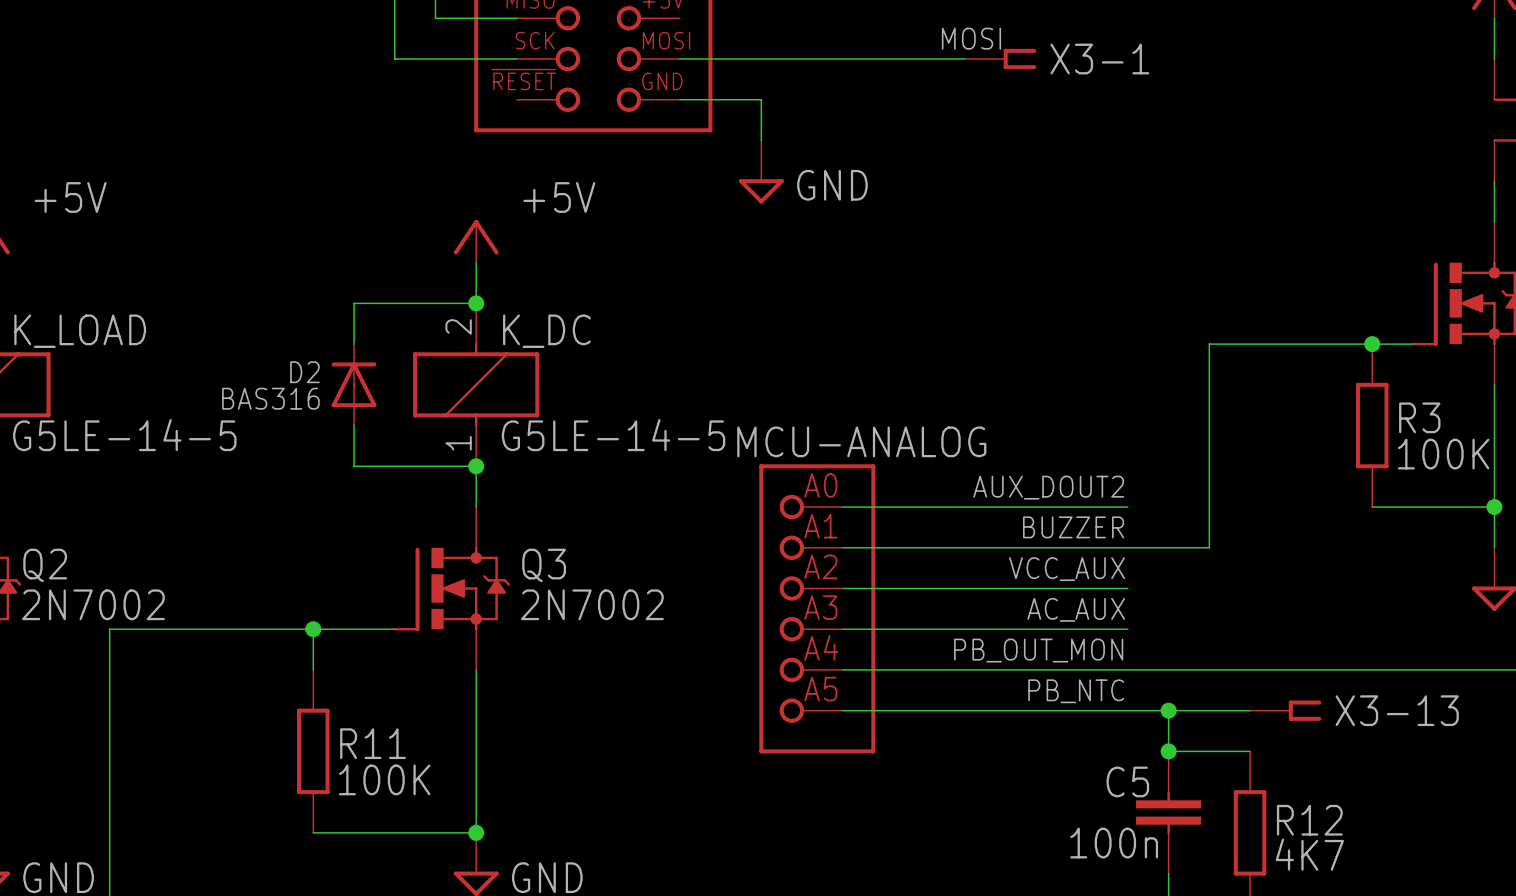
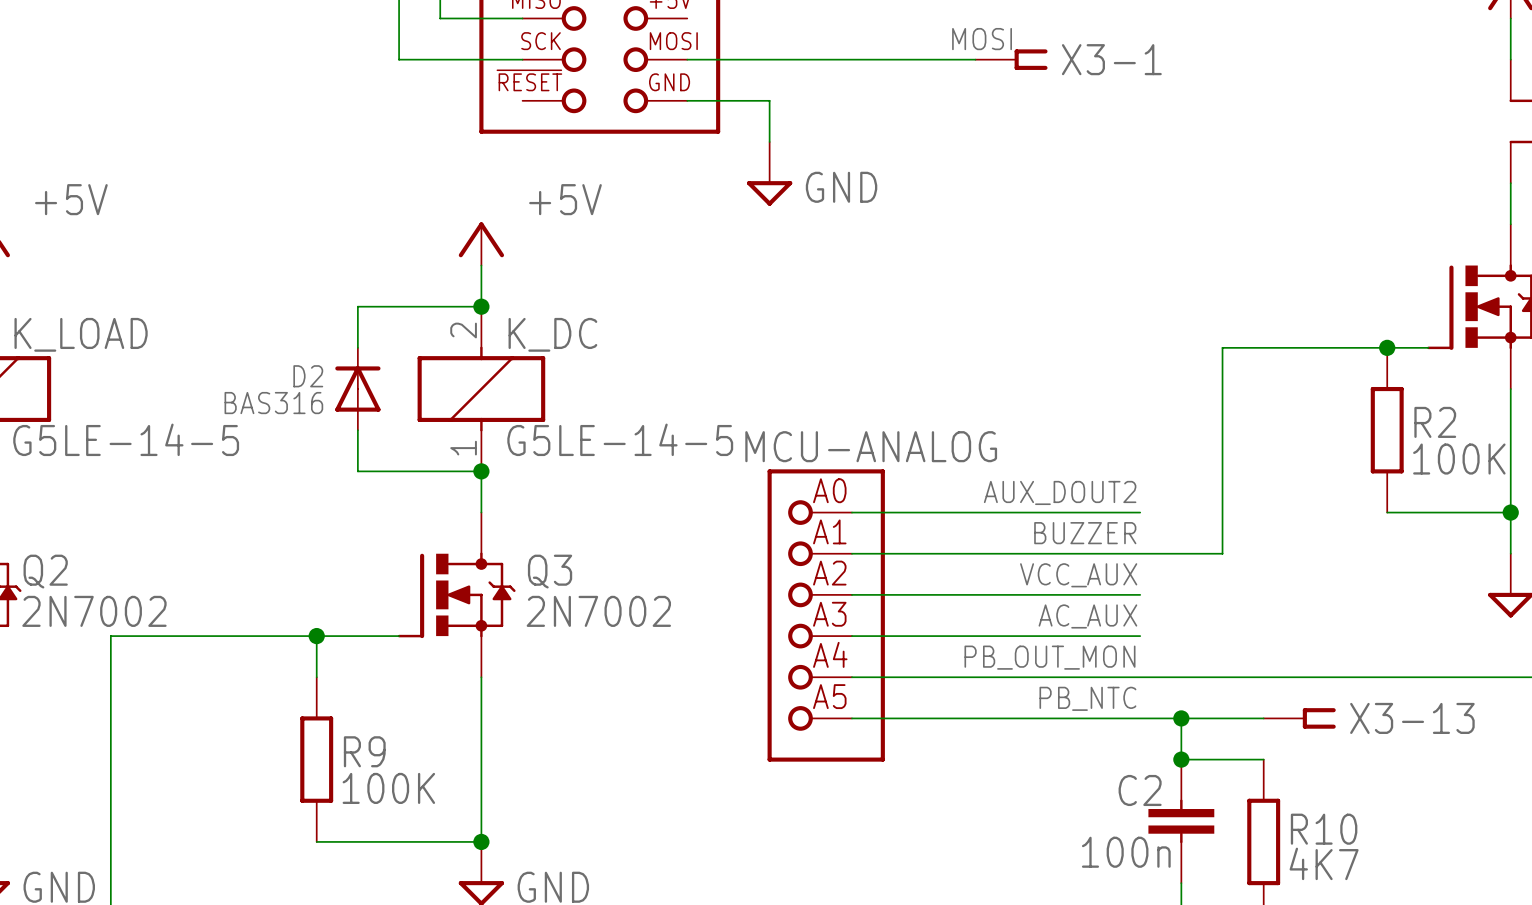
R3 name: R3 (1419, 417) -> R2 (1435, 422)
R11 name: R11 (373, 743) -> R9 (364, 751)
C5 name: C5 (1127, 781) -> C2 (1140, 790)
R12 name: R12 (1309, 820) -> R10 (1324, 829)

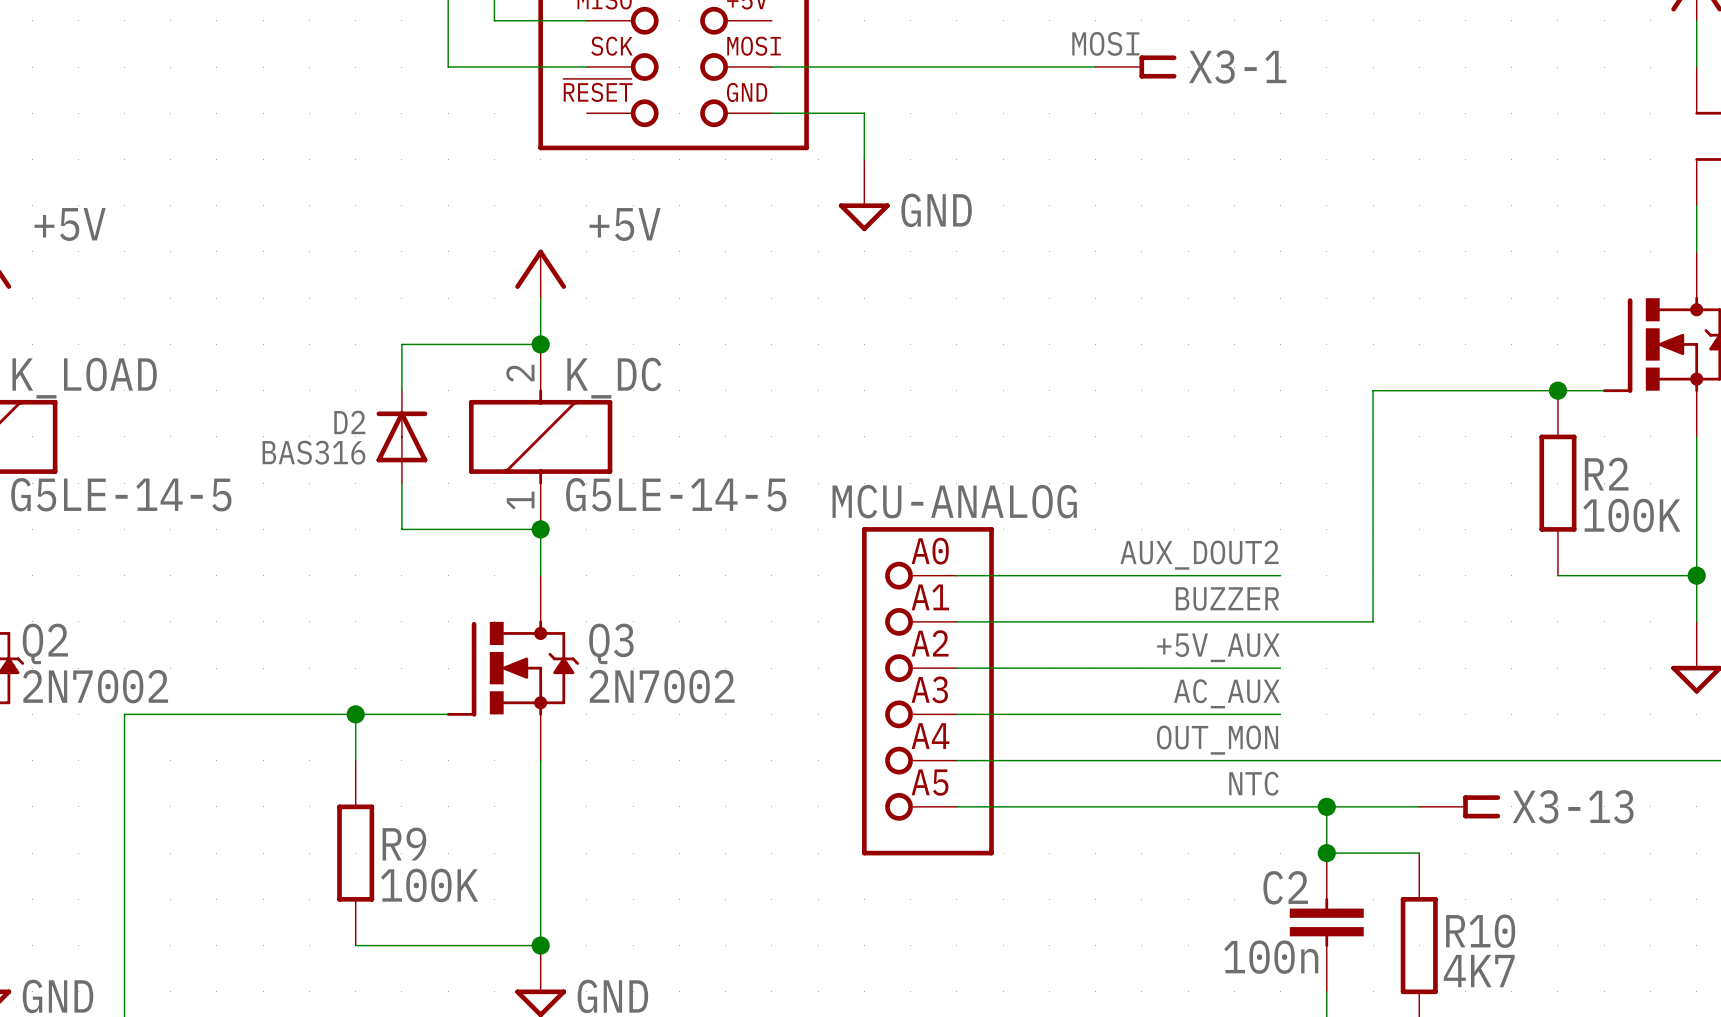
label: VCC_AUX (1078, 575) -> +5V_AUX (1218, 647)
label: PB_OUT_MON (1049, 657) -> OUT_MON (1217, 740)
label: PB_NTC (1087, 698) -> NTC (1253, 783)

